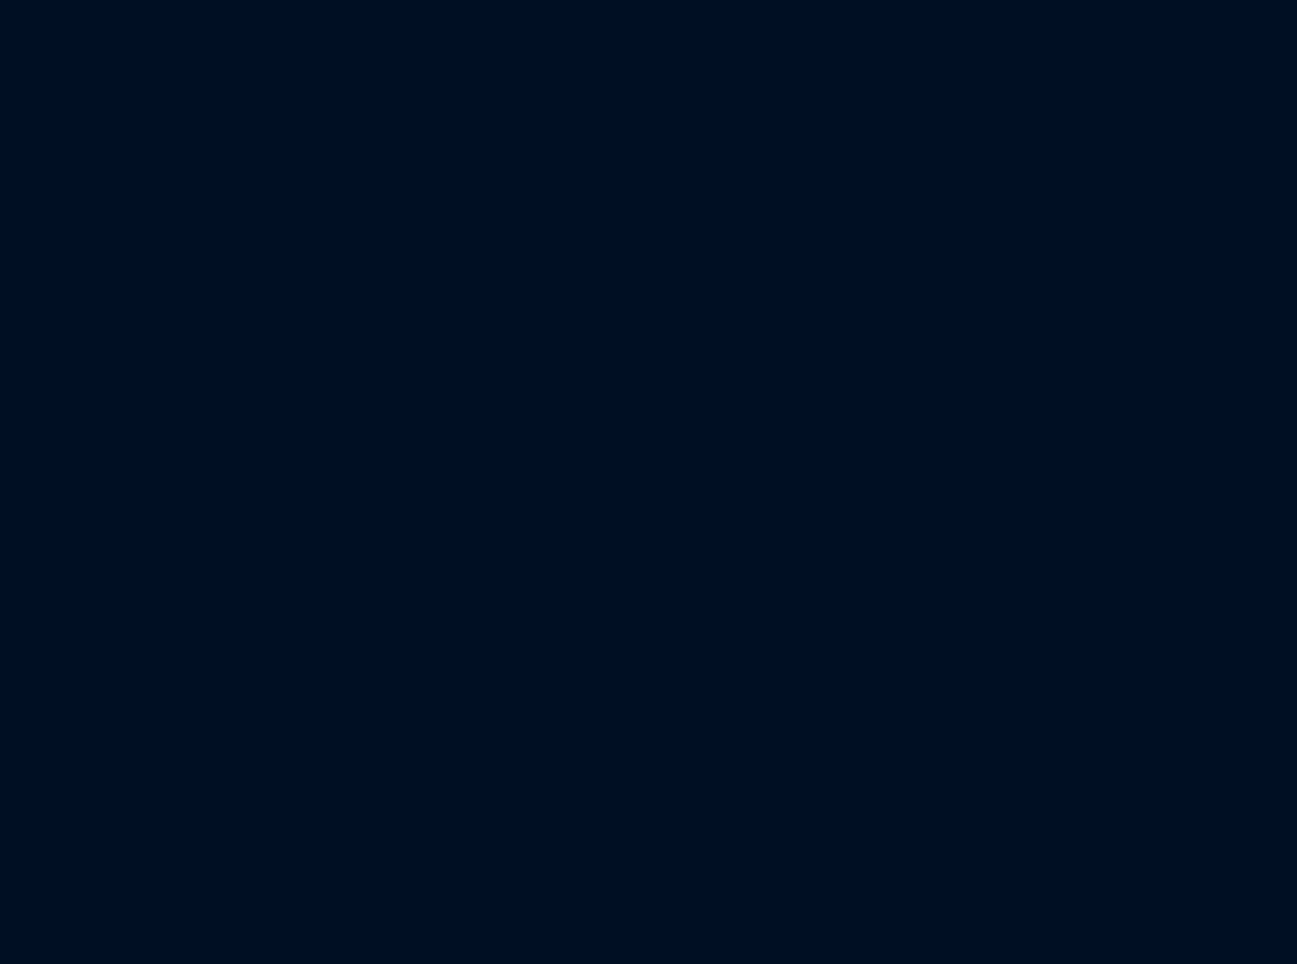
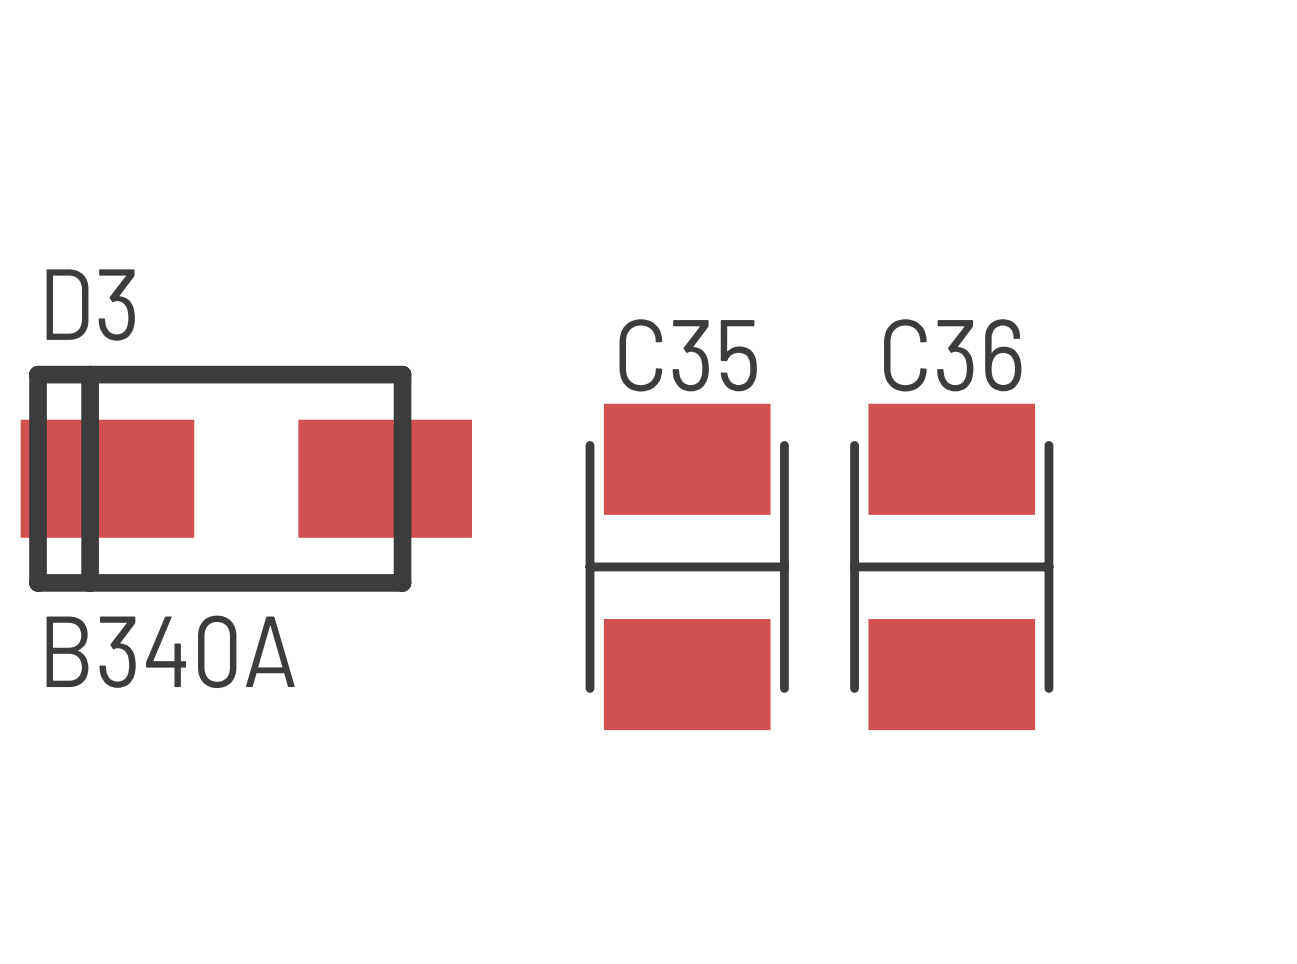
D3: none -> B340A (246, 478)
C35: none -> (687, 566)
C36: none -> (951, 566)

